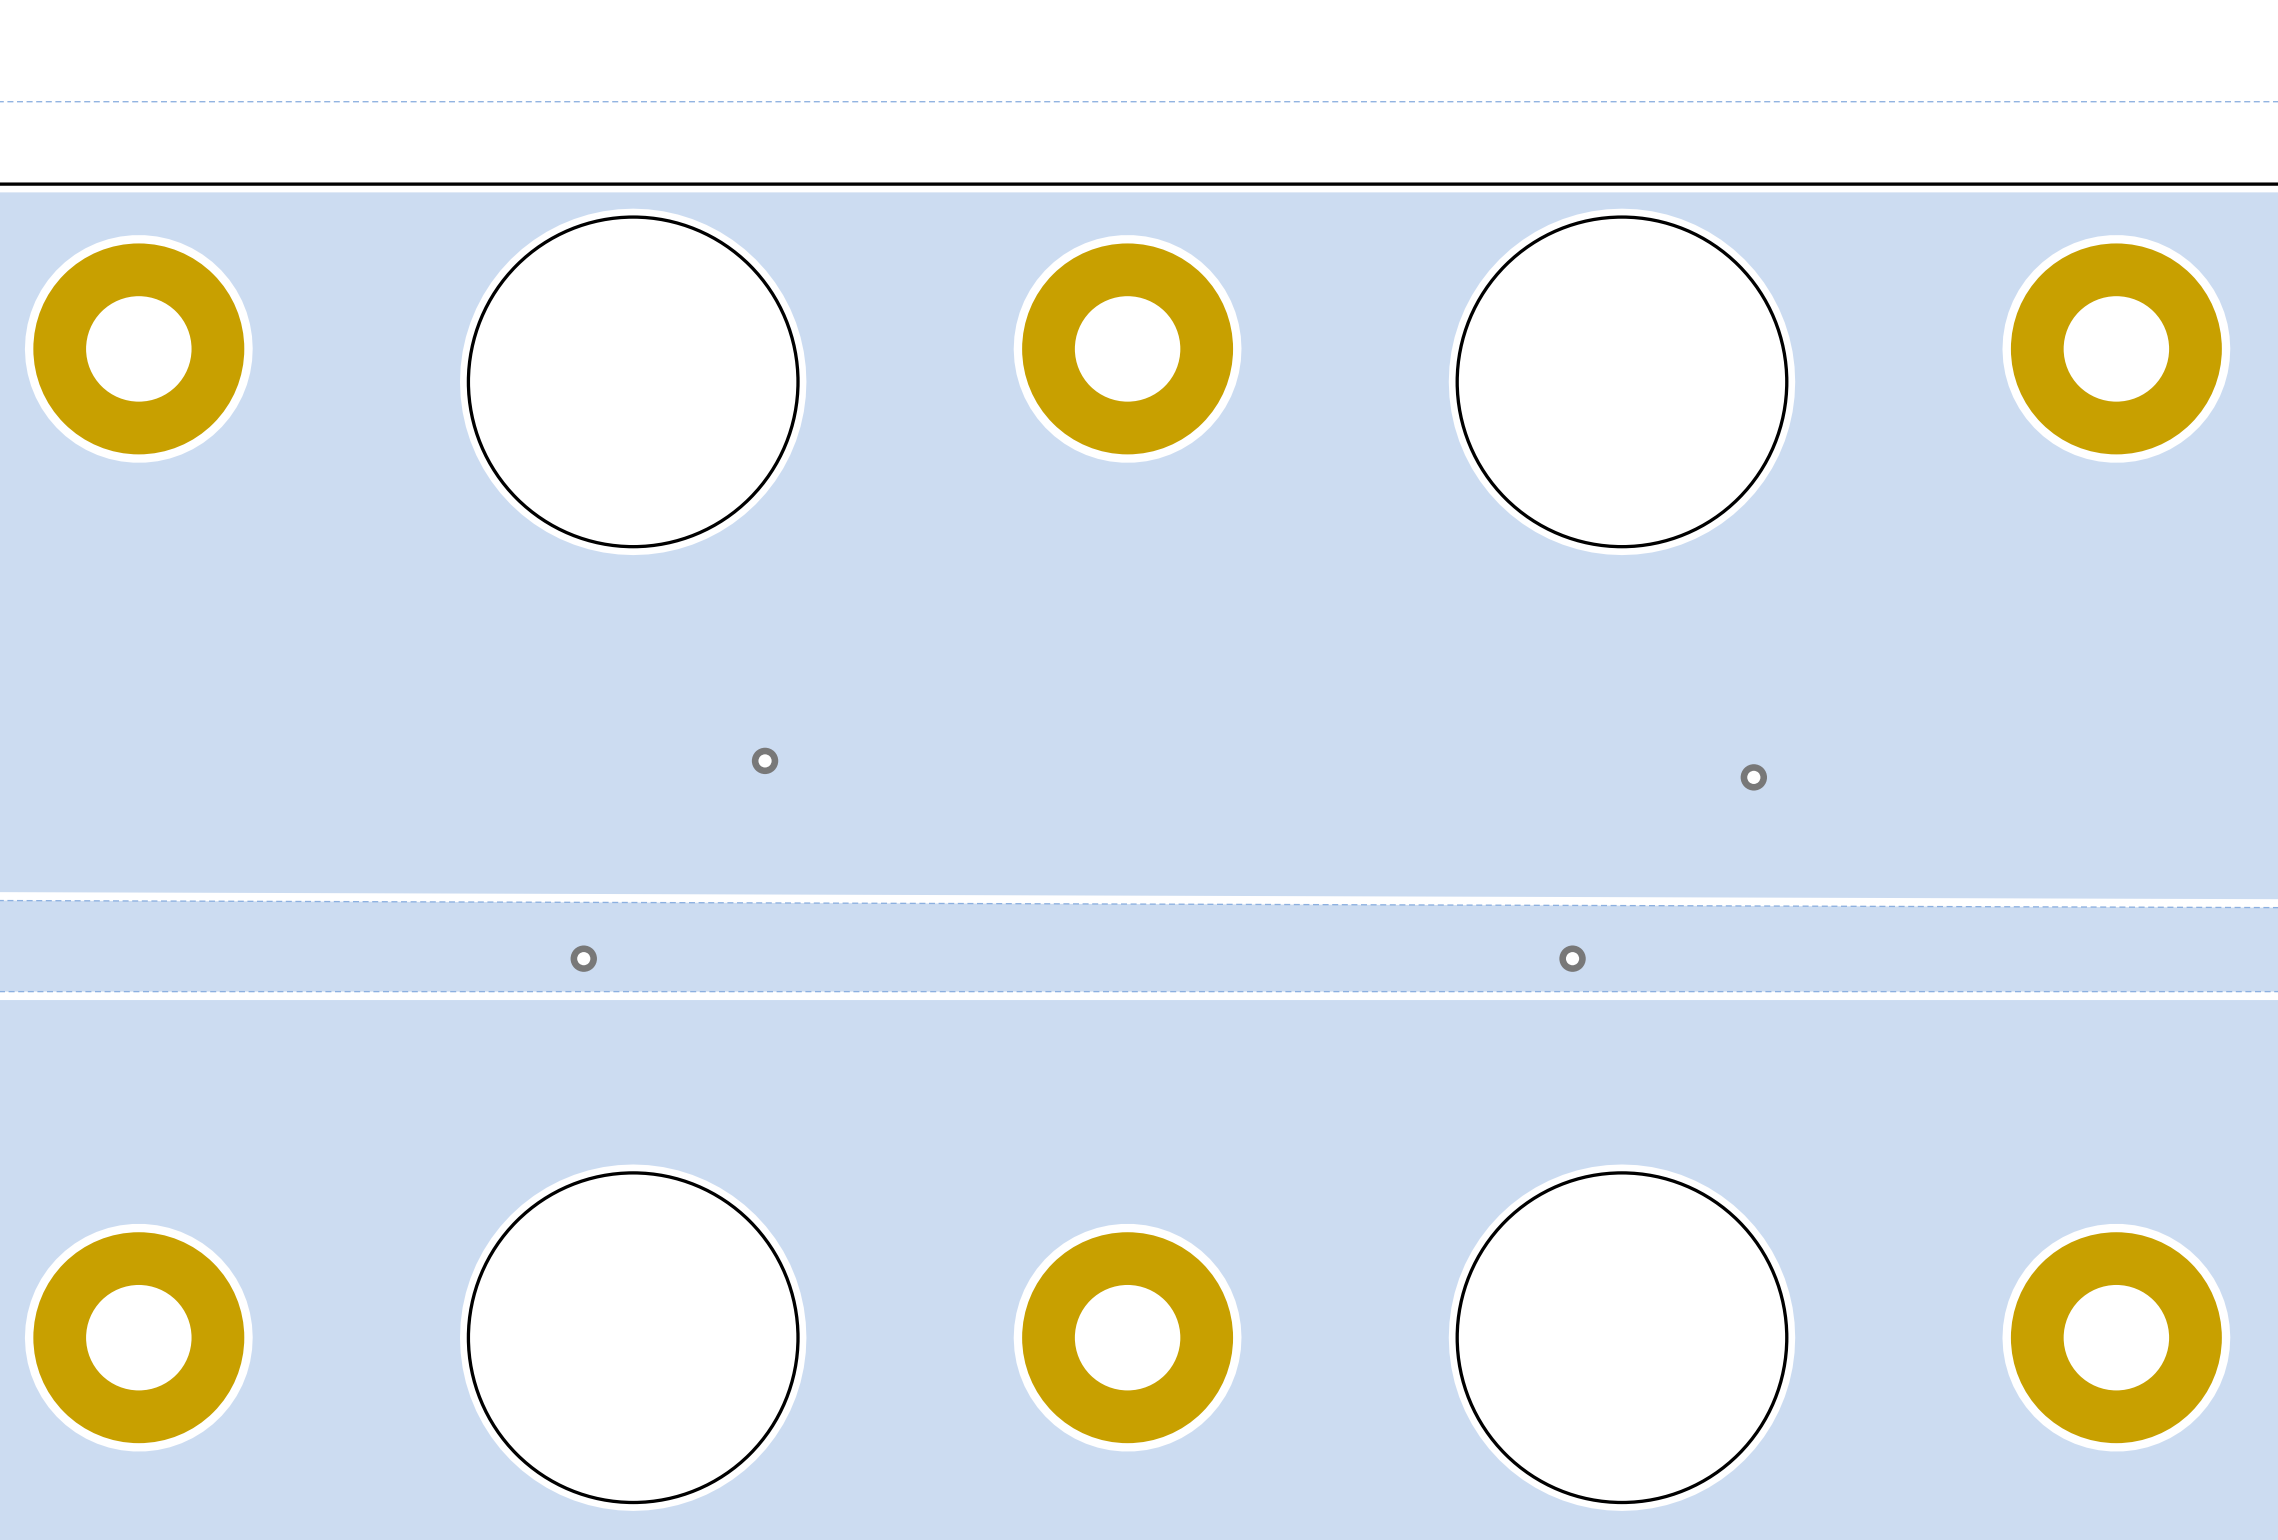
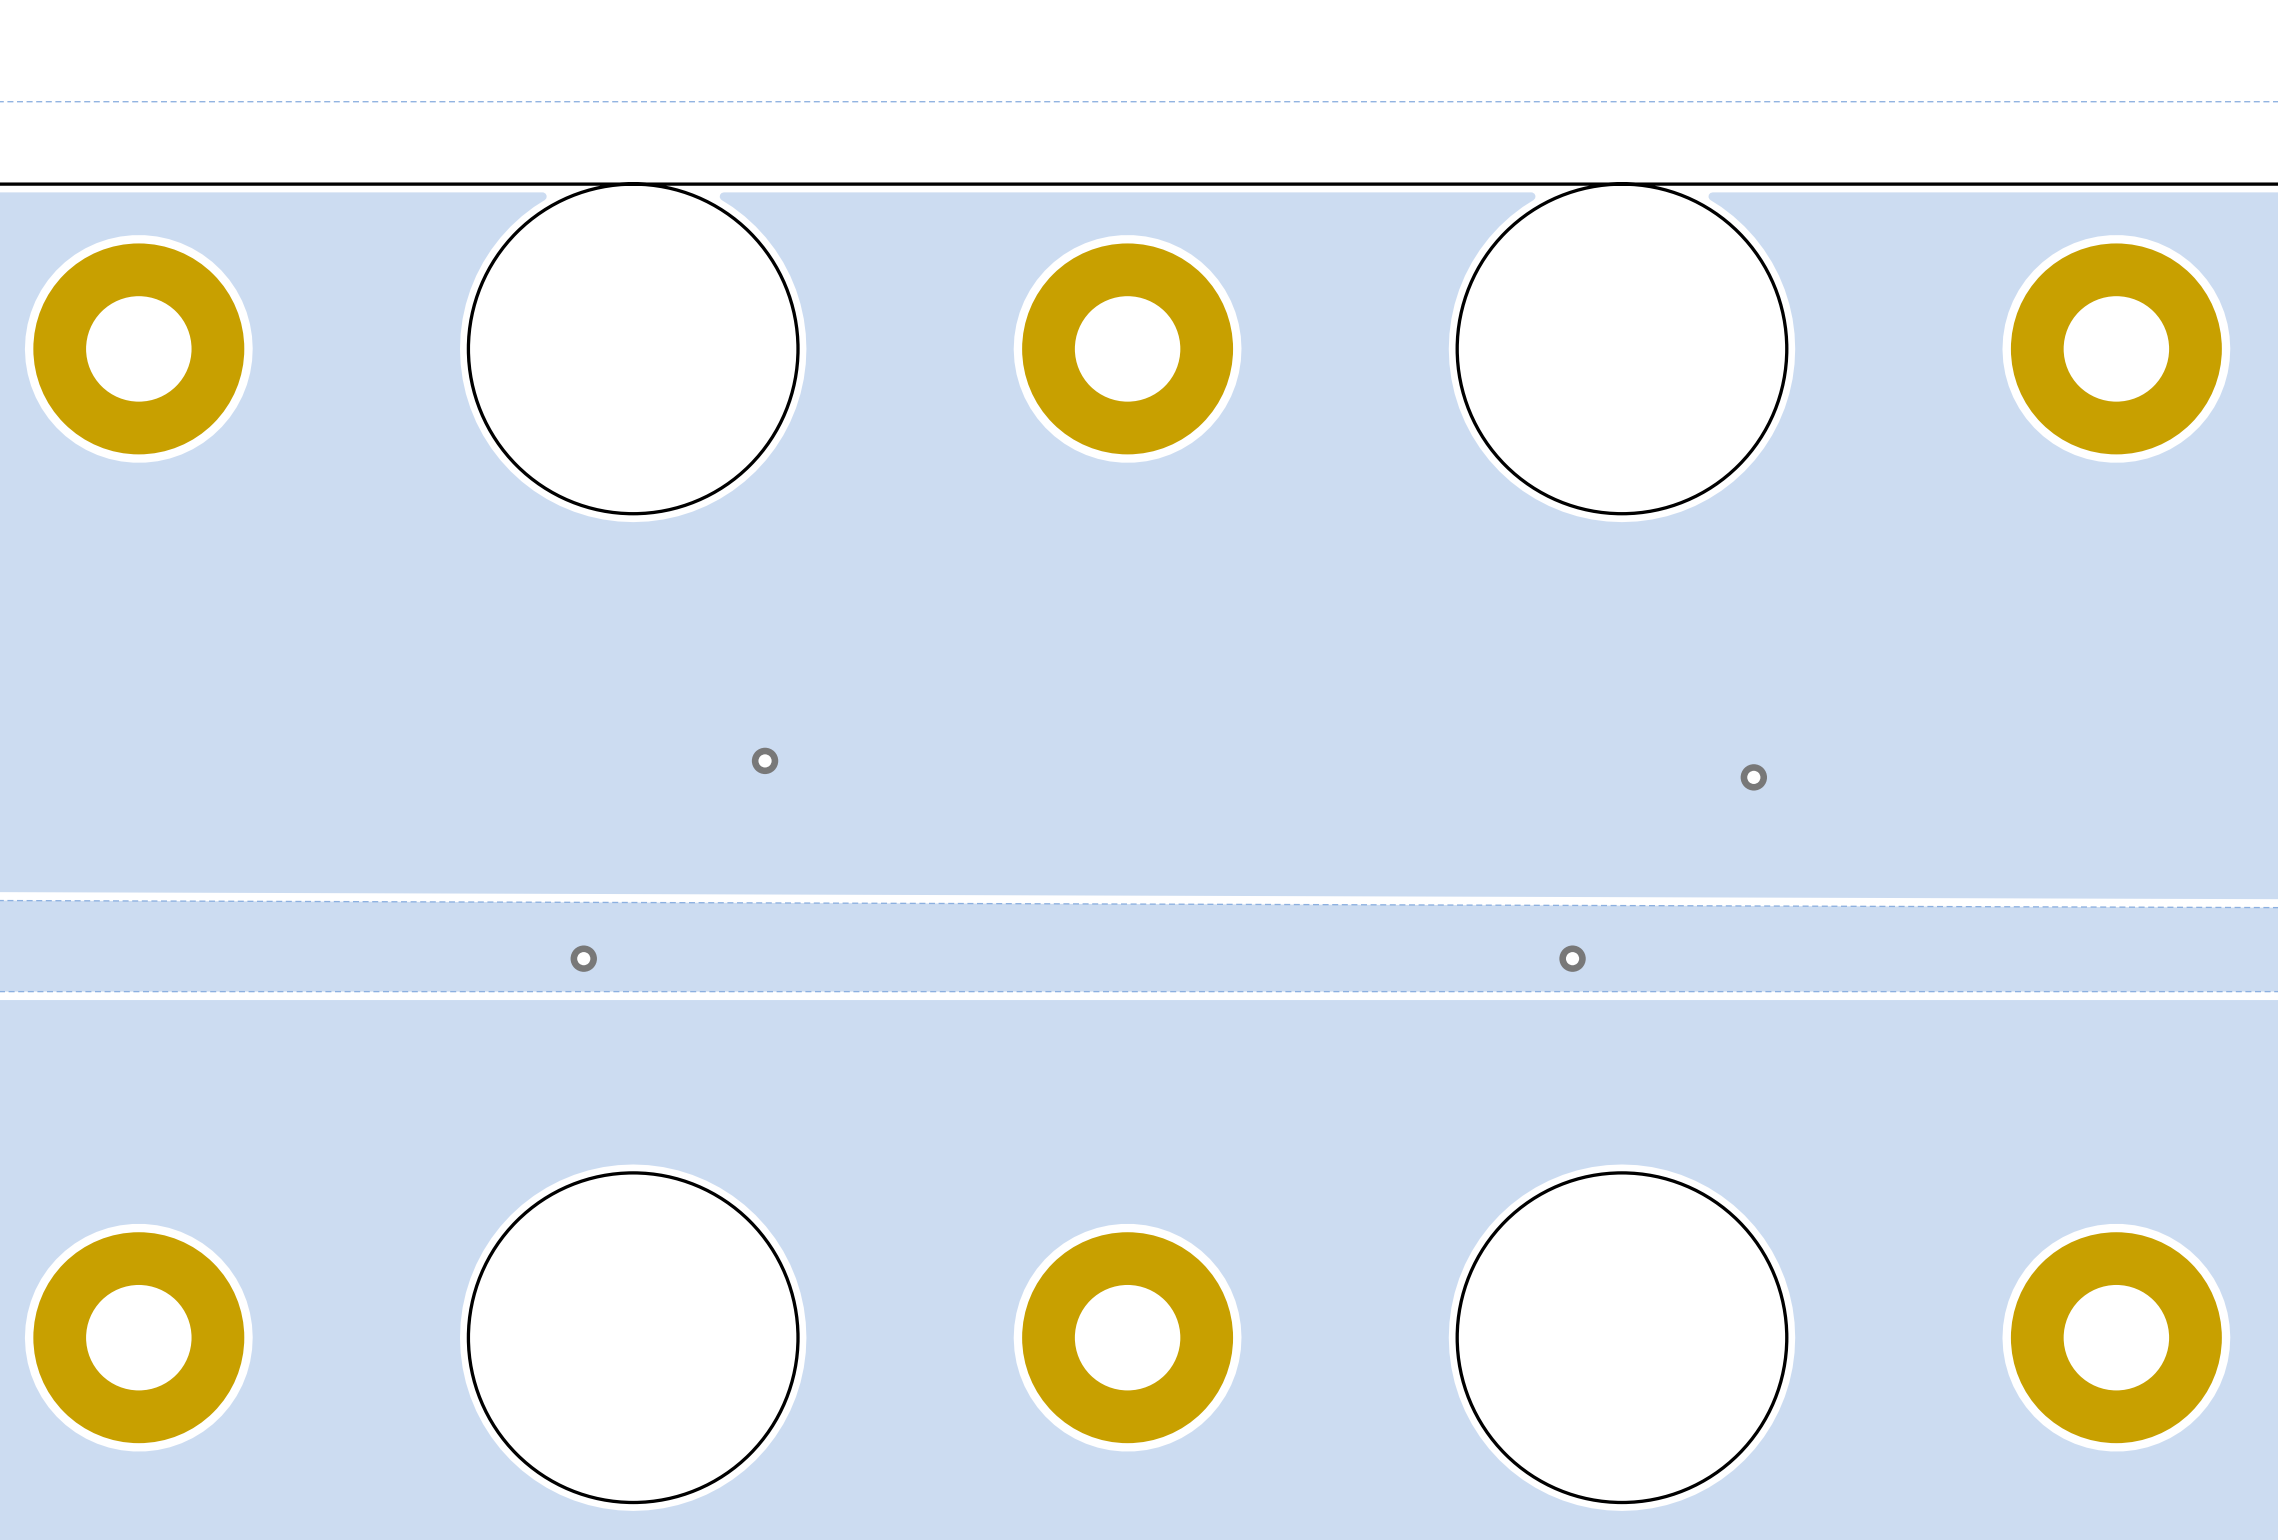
round board edge position: (633, 381) -> (633, 348)
round board edge position: (1621, 381) -> (1621, 348)

